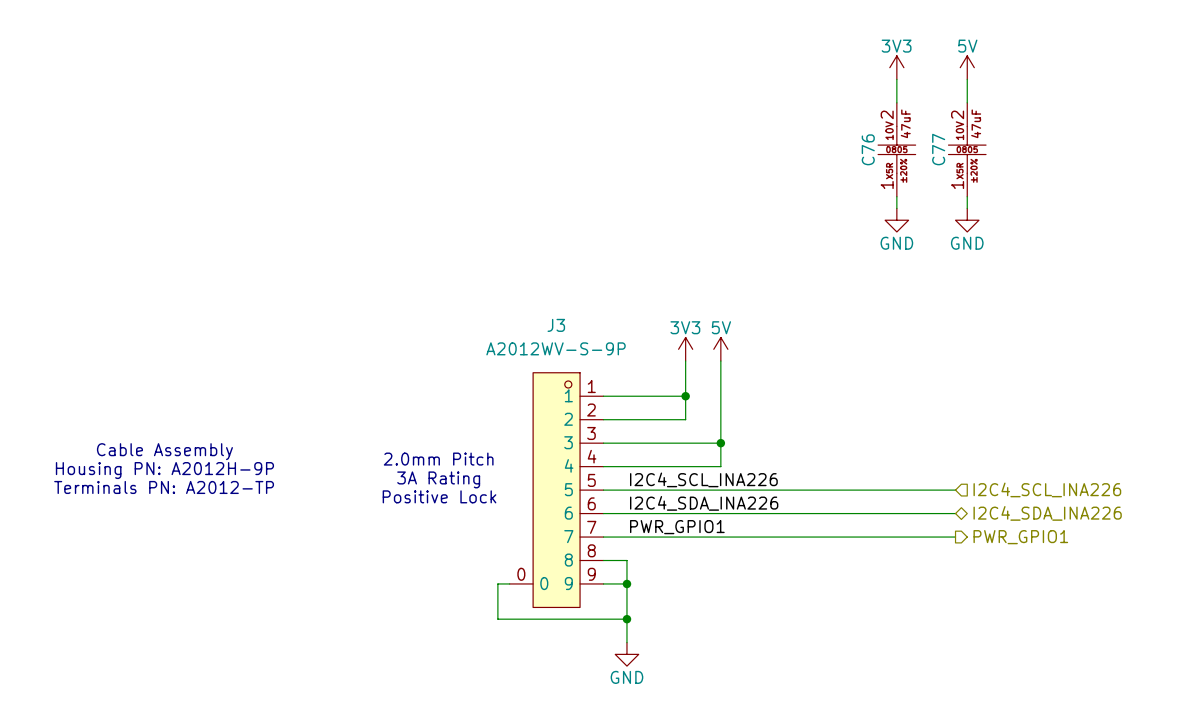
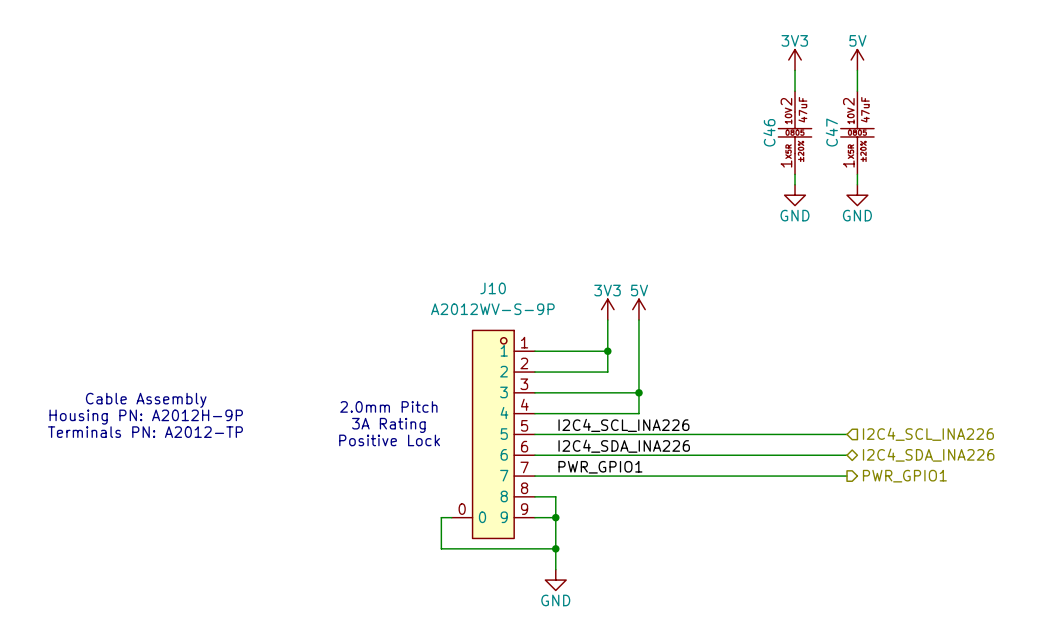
C76 name: C76 (868, 149) -> C46 (769, 132)
C77 name: C77 (938, 149) -> C47 (831, 132)
J3 name: J3 (556, 325) -> J10 (493, 288)

